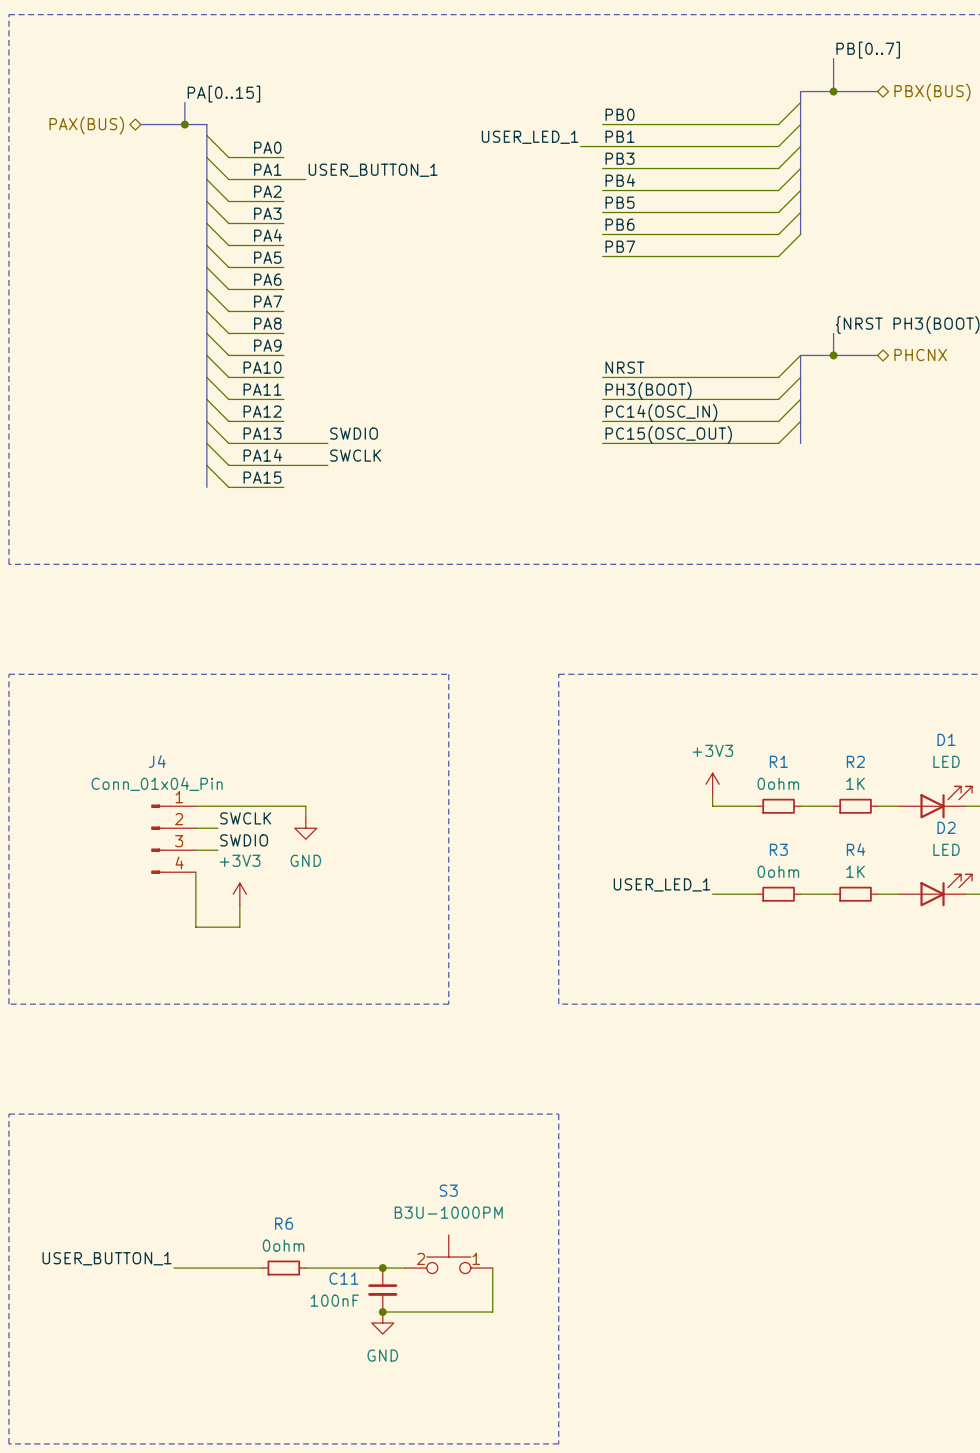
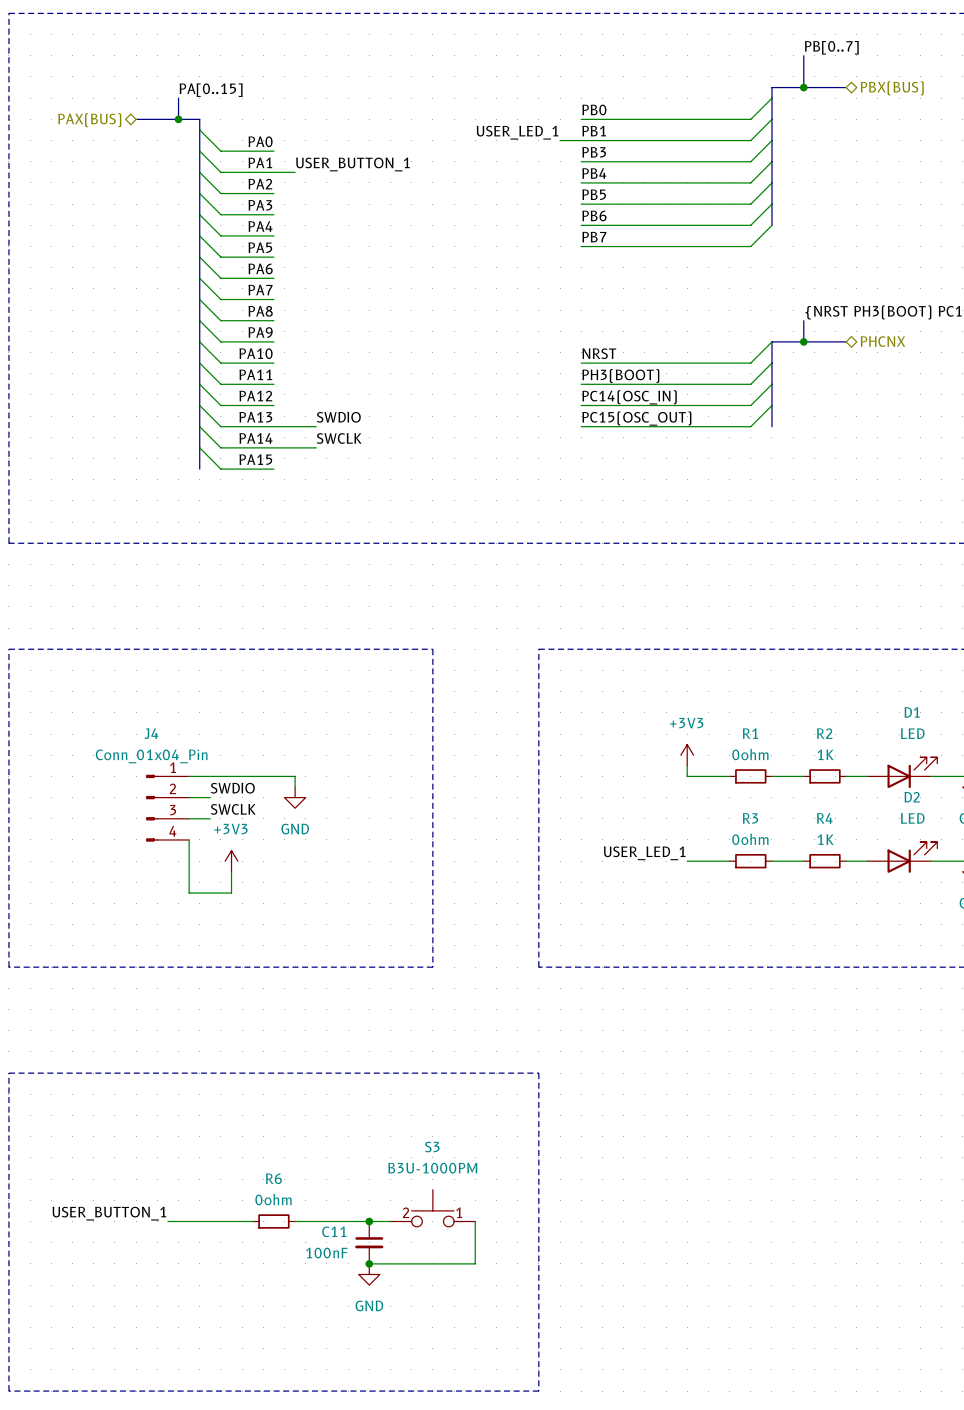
label: SWCLK (245, 818) -> SWDIO (232, 788)
label: SWDIO (244, 840) -> SWCLK (233, 809)

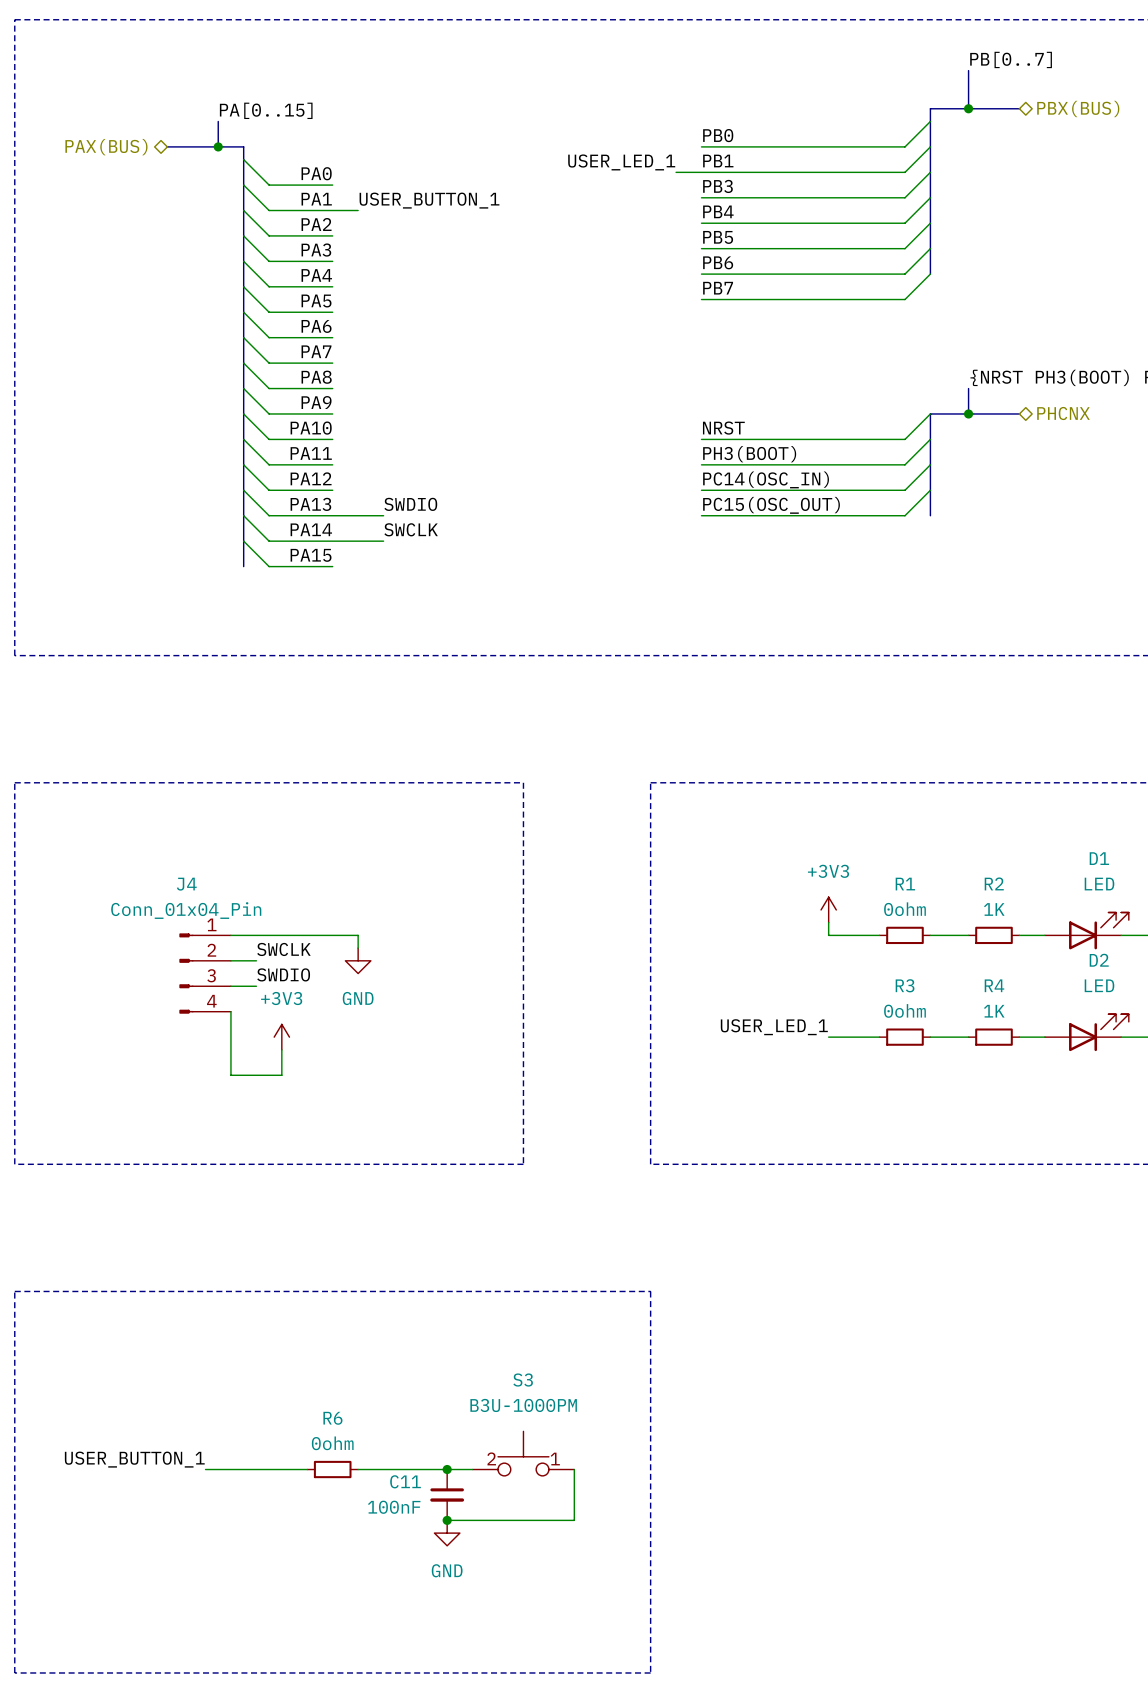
label: SWDIO (232, 788) -> SWCLK (283, 949)
label: SWCLK (233, 809) -> SWDIO (283, 974)

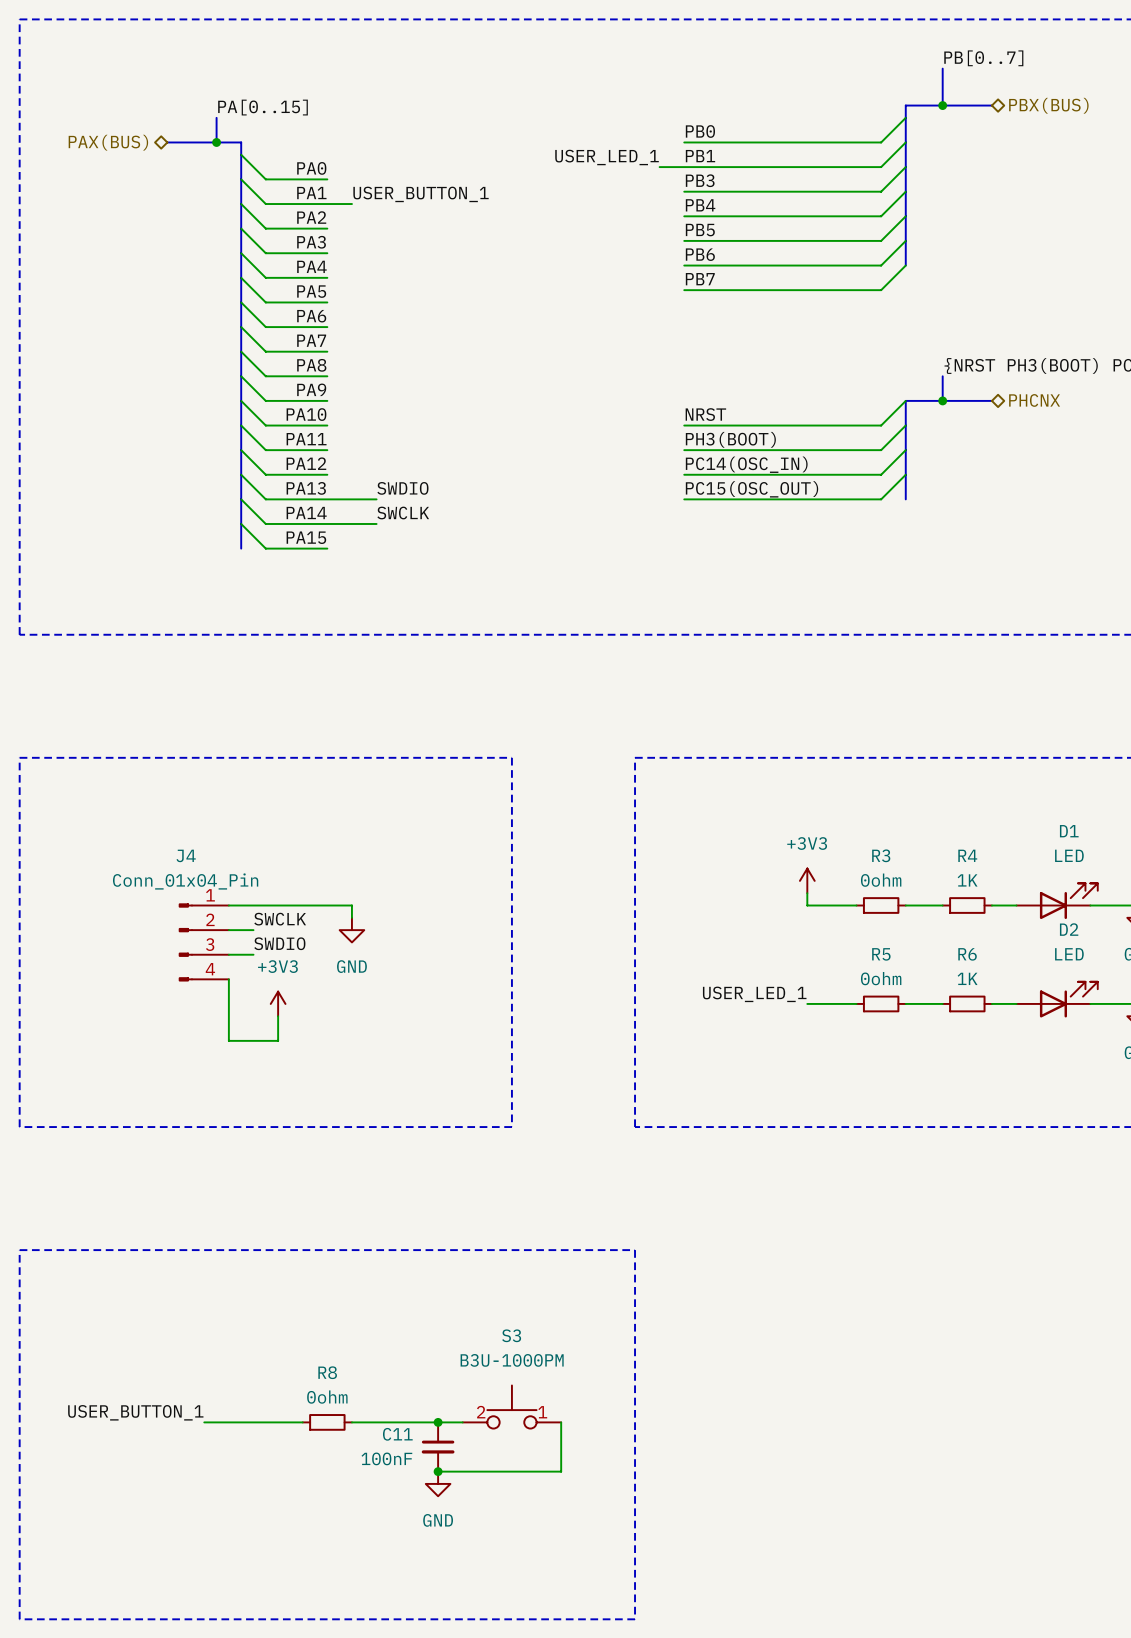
R2 name: R2 (994, 883) -> R4 (967, 855)
R1 name: R1 (905, 884) -> R3 (881, 855)
R3 name: R3 (905, 985) -> R5 (881, 954)
R4 name: R4 (994, 985) -> R6 (967, 954)
R6 name: R6 (332, 1418) -> R8 (327, 1372)

